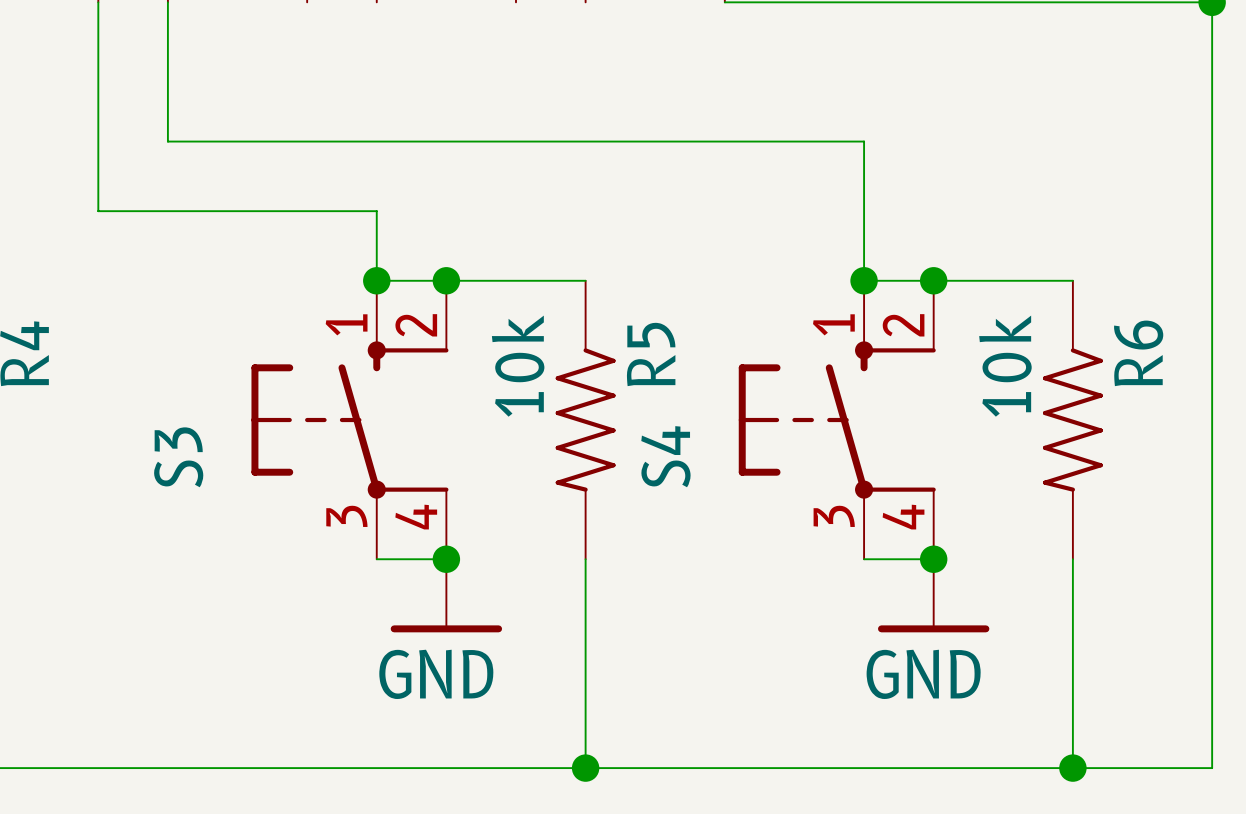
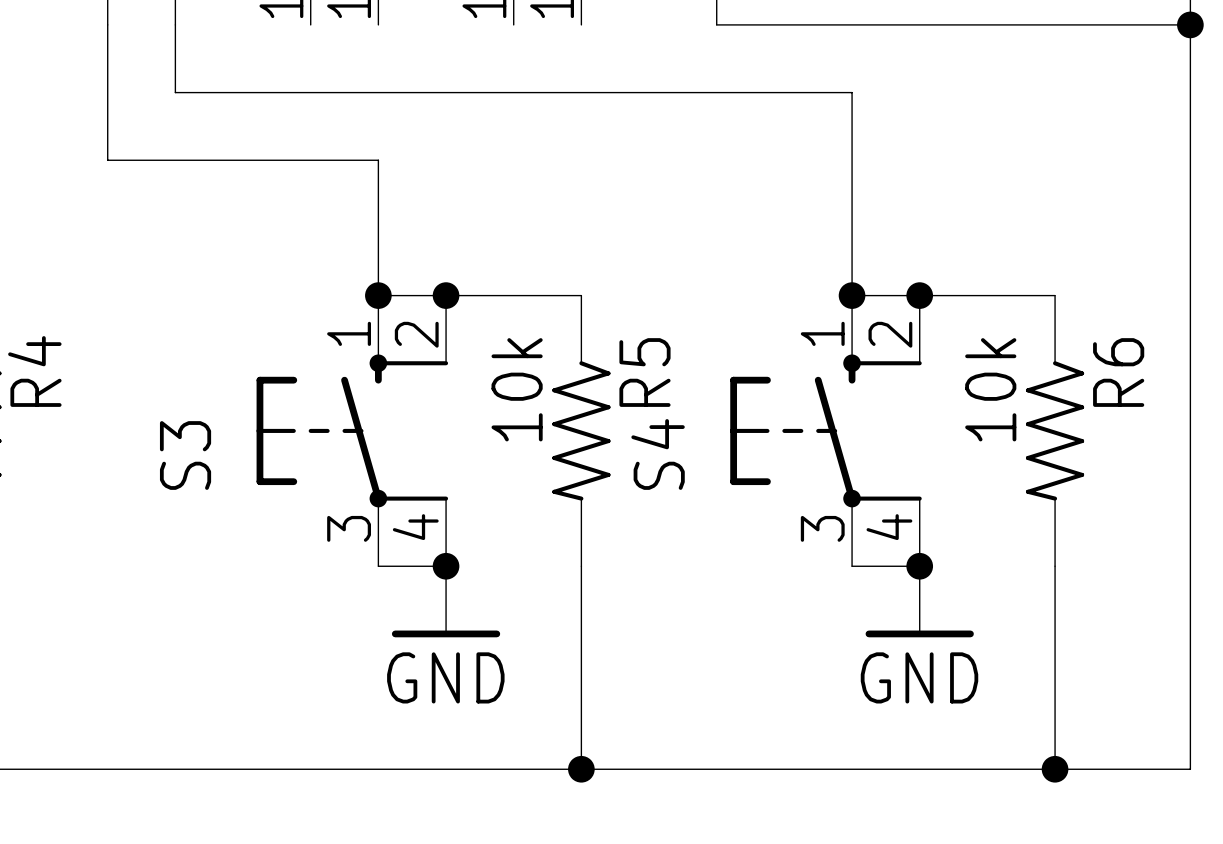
wire: (167, 71) (167, 141) -> (107, 160) (175, 160)
wire: (98, 141) (98, 211) (376, 211) -> (378, 160) (378, 227)
wire: (376, 141) (864, 141) -> (175, 92) (852, 92) (852, 160)

